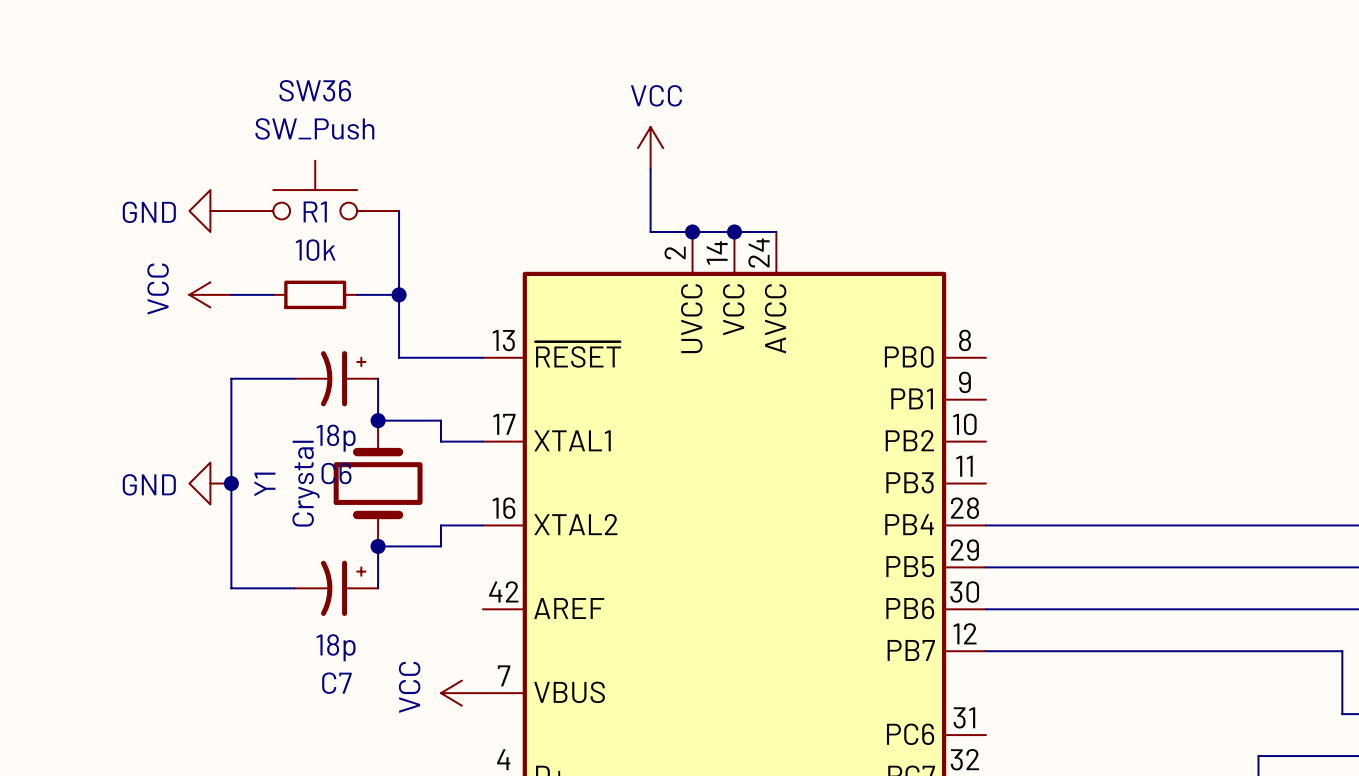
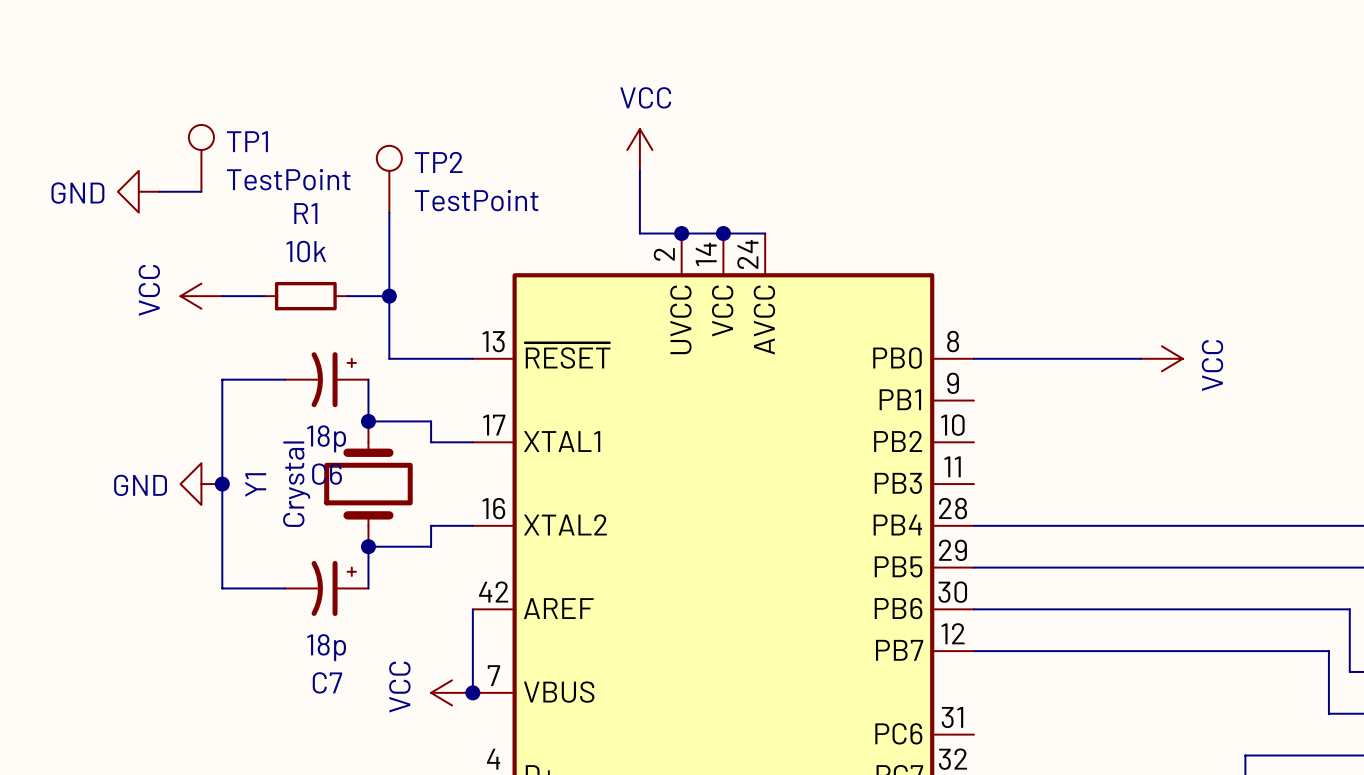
TP1: none -> TestPoint (201, 158)
TP2: none -> TestPoint (389, 179)
wire: none -> (159, 191) (201, 191)
SW36: SW_Push (315, 190) -> none
power symbol position: GND (210, 211) -> GND (138, 191)
wire: none -> (973, 358) (1141, 358)
power symbol: none -> VCC (1161, 358)
wire: none -> (472, 609) (472, 692)
junction: none -> (472, 692)

